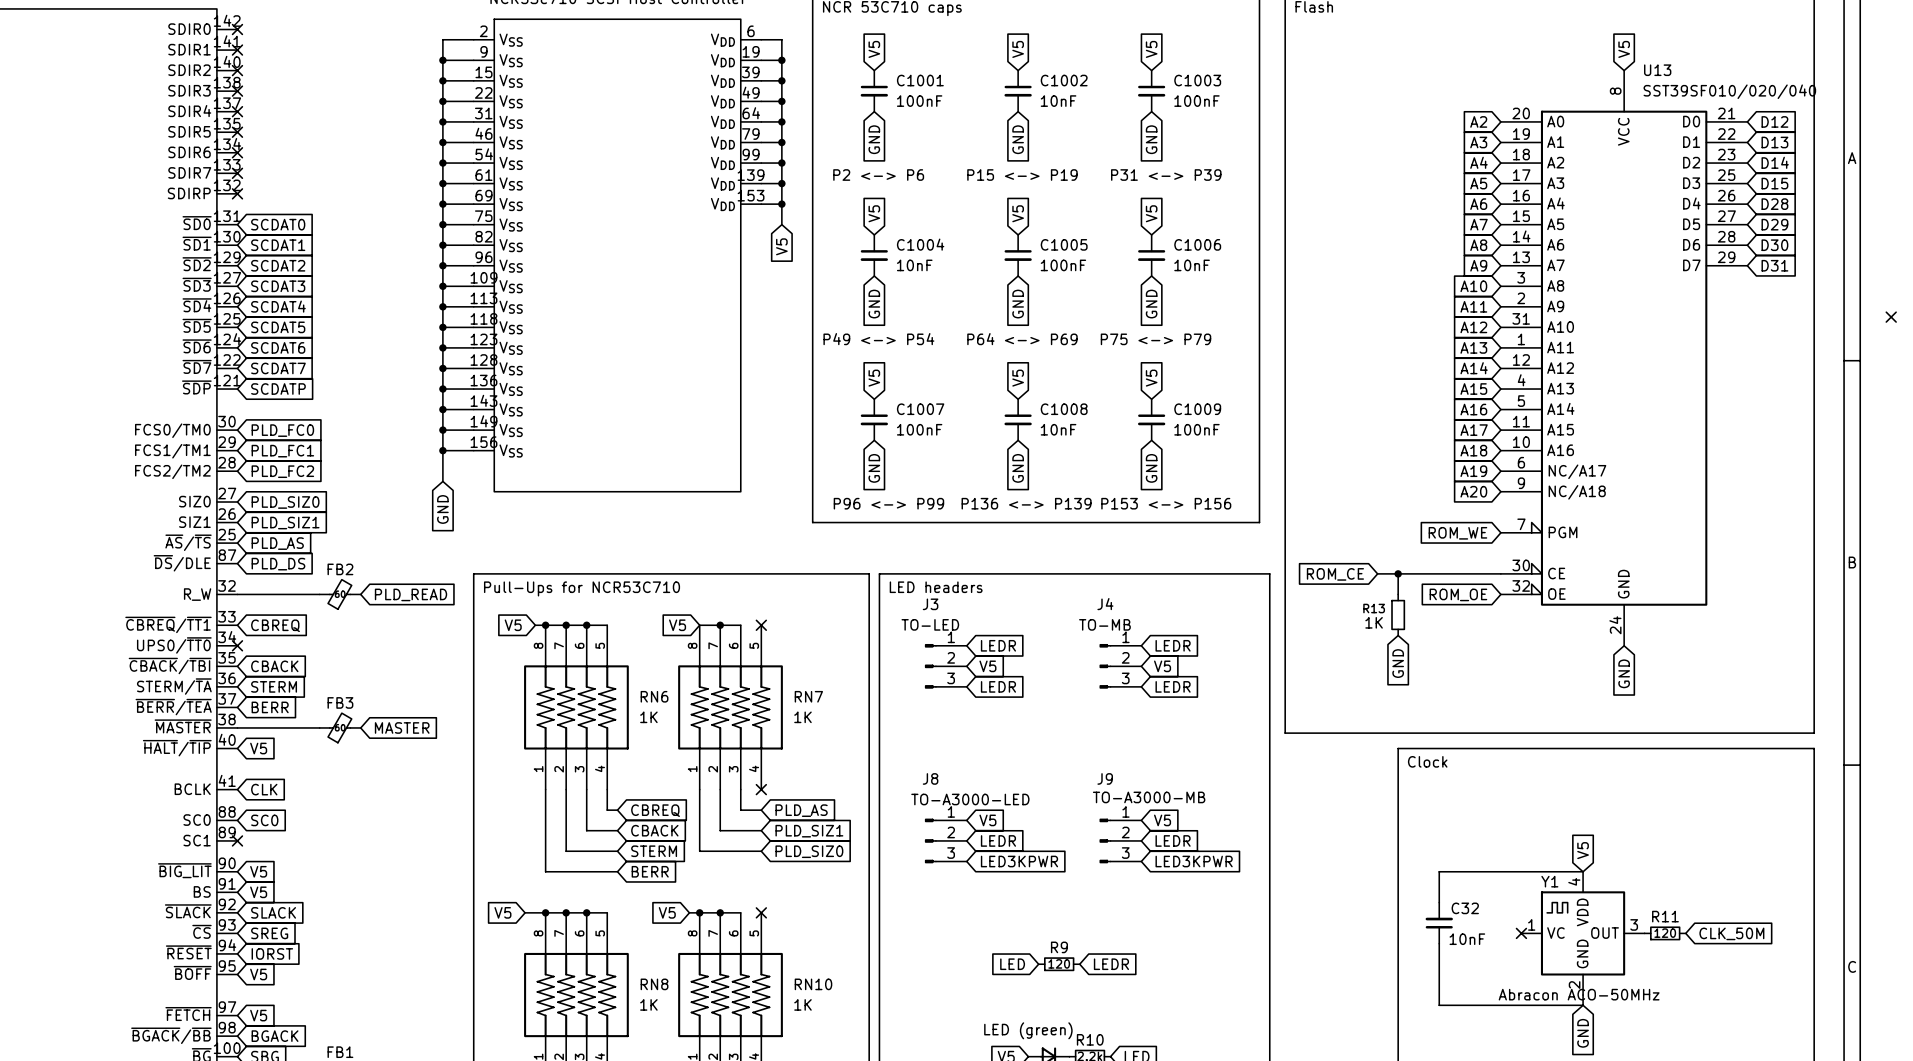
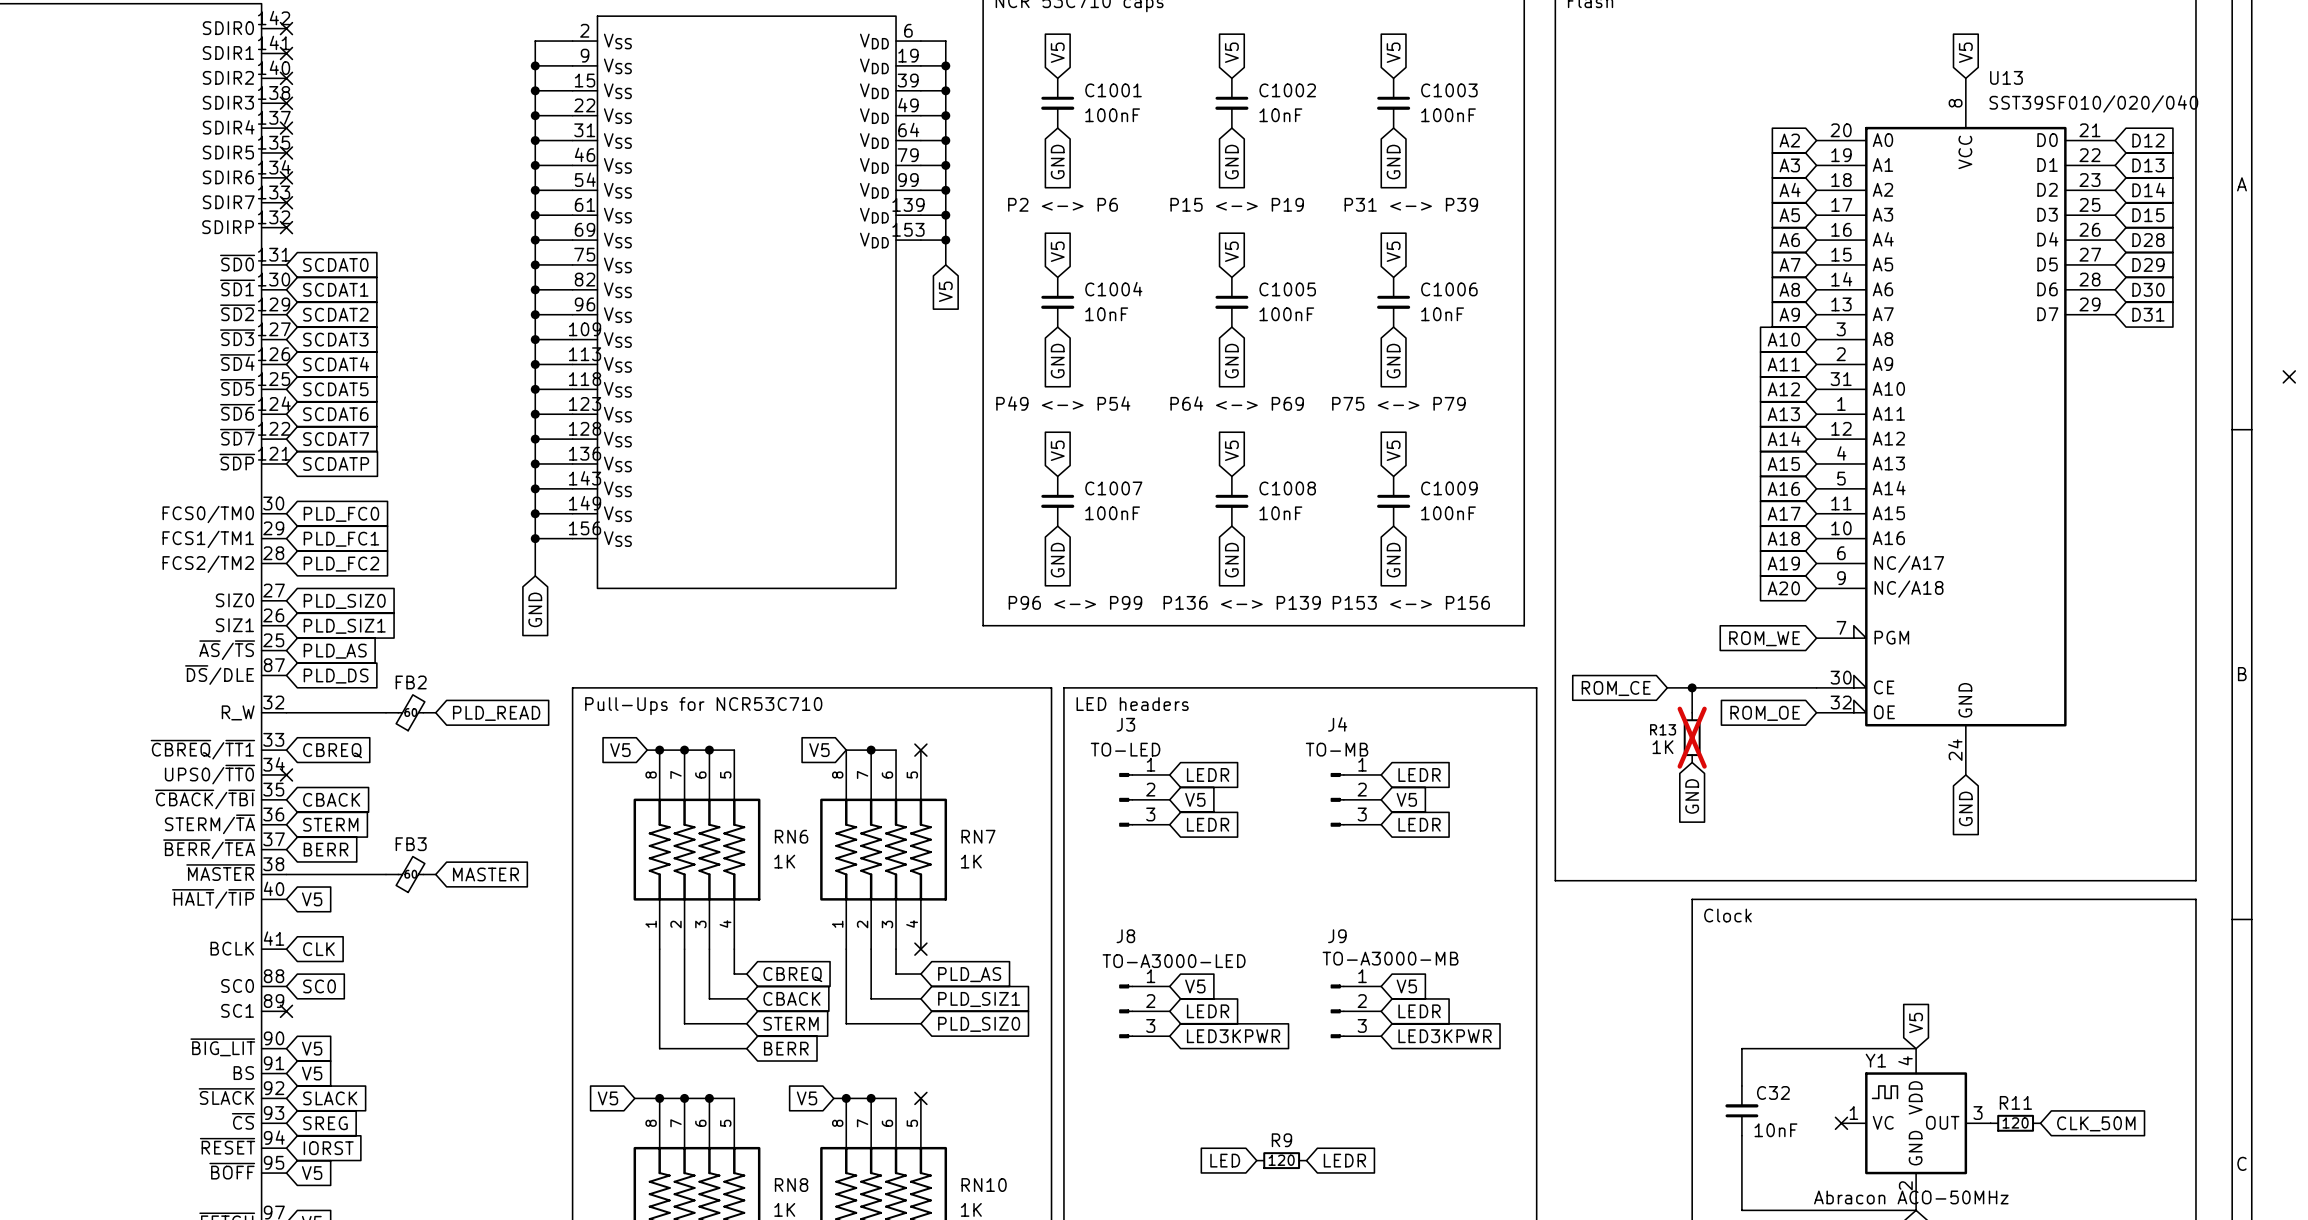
R13 do-not-place cross: none -> (1692, 737)

